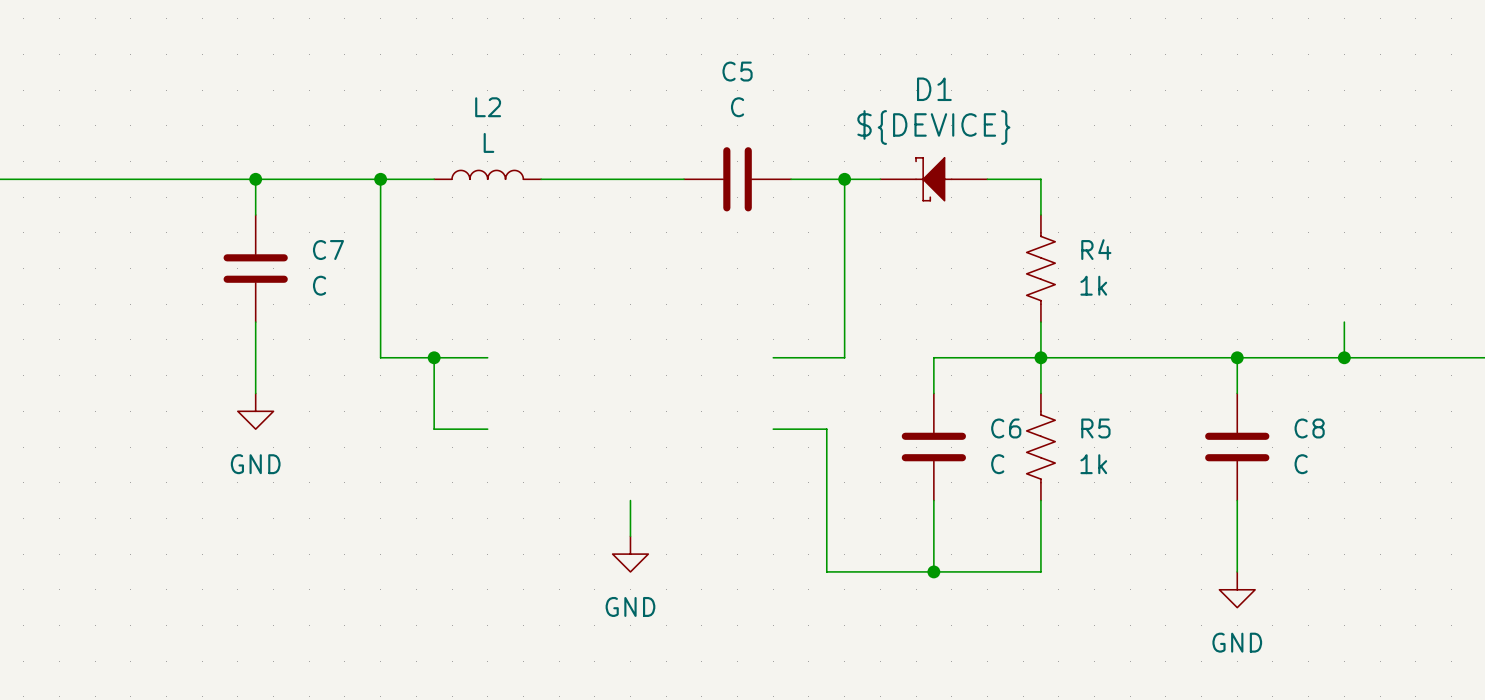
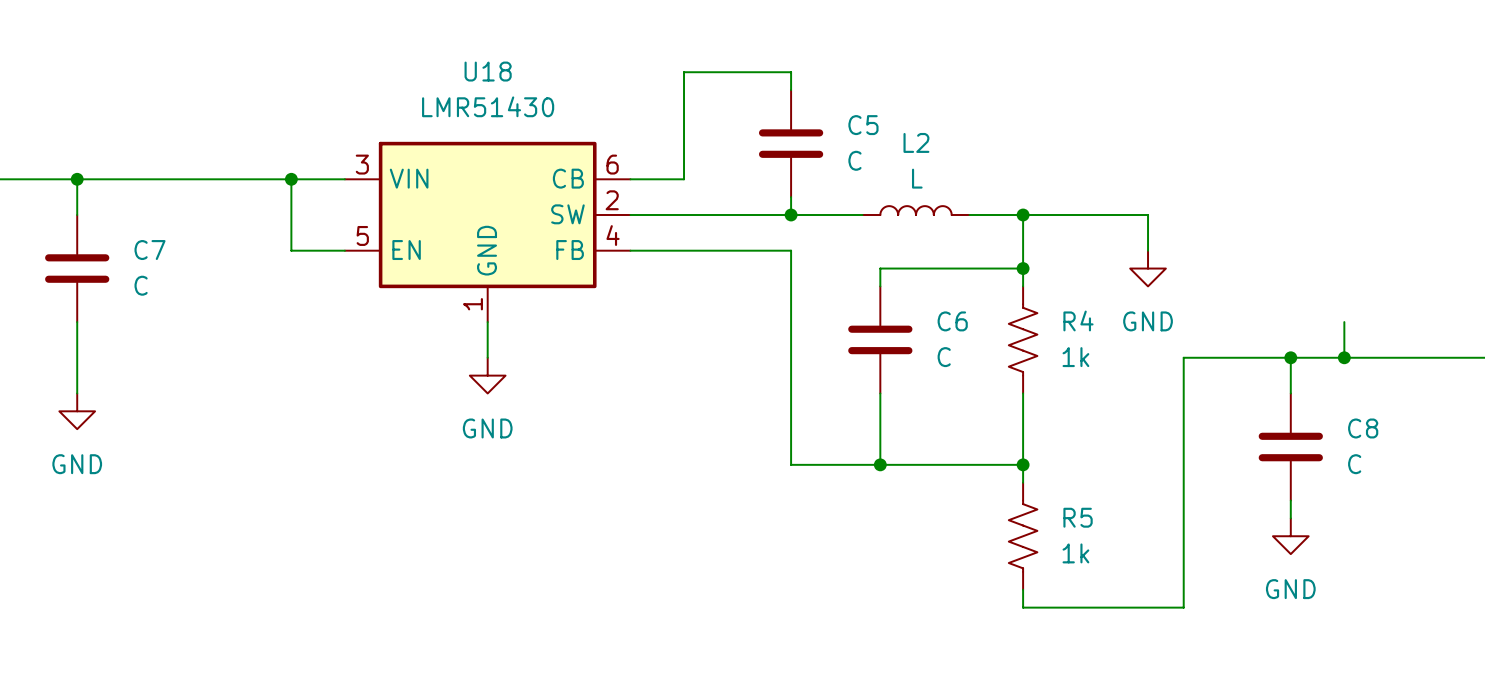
C5 name position: C5 (737, 71) -> C5 (863, 125)
wire: none -> (791, 90) (791, 72) (684, 72) (684, 179)
L2 position: (487, 174) -> (916, 210)
junction: none -> (77, 179)
wire: (255, 179) (255, 214) -> (77, 179) (77, 214)
junction position: (255, 179) -> (291, 179)
wire: (380, 179) (380, 357) (487, 357) -> (487, 322) (487, 357)
junction: (380, 179) -> none
C5 rotation: 0° (737, 179) -> 90° clockwise (791, 143)
C5 position: (737, 179) -> (791, 143)
wire: (791, 179) (880, 179) -> none
wire: (844, 179) (844, 357) (773, 357) -> none
junction position: (844, 179) -> (791, 214)
D1: ${DEVICE} (933, 179) -> none
wire: (987, 179) (1040, 179) (1040, 214) -> none
wire: none -> (791, 197) (791, 214)
wire: none -> (630, 214) (862, 214)
wire: none -> (969, 214) (1148, 214) (1148, 250)
junction: none -> (1023, 214)
U18: none -> LMR51430 (487, 231)
wire: none -> (630, 250) (791, 250) (791, 464) (1023, 464)
C7 position: (255, 268) -> (77, 268)
wire: none -> (1023, 268) (880, 268) (880, 286)
junction: none -> (1023, 268)
R4 position: (1040, 268) -> (1023, 339)
power symbol: none -> GND (1148, 268)
wire: (255, 322) (255, 393) -> (77, 322) (77, 393)
wire: (1040, 322) (1040, 393) -> (1023, 214) (1023, 286)
wire: (434, 357) (434, 429) (487, 429) -> (291, 179) (291, 250) (344, 250)
junction: (434, 357) -> none
junction: (1040, 357) -> none
wire: (1183, 357) (933, 357) (933, 393) -> (1183, 357) (1183, 607) (1023, 607) (1023, 589)
wire: (1237, 357) (1237, 393) -> (1290, 357) (1290, 393)
junction position: (1237, 357) -> (1290, 357)
power symbol: none -> GND (487, 375)
wire: none -> (1023, 393) (1023, 482)
power symbol: none -> GND (77, 411)
power symbol: GND (255, 411) -> none
wire: (773, 429) (826, 429) (826, 571) (1040, 571) (1040, 500) -> none
C6 position: (933, 447) -> (880, 339)
R5 position: (1040, 447) -> (1023, 536)
C8 position: (1237, 447) -> (1290, 447)
junction: none -> (880, 464)
junction: none -> (1023, 464)
wire: (630, 500) (630, 536) -> none
wire: (933, 500) (933, 571) -> (880, 393) (880, 464)
wire: (1237, 500) (1237, 571) -> none
wire: none -> (1290, 500) (1290, 518)
power symbol: GND (630, 554) -> none
junction: (933, 571) -> none
power symbol position: GND (1237, 589) -> GND (1290, 536)

